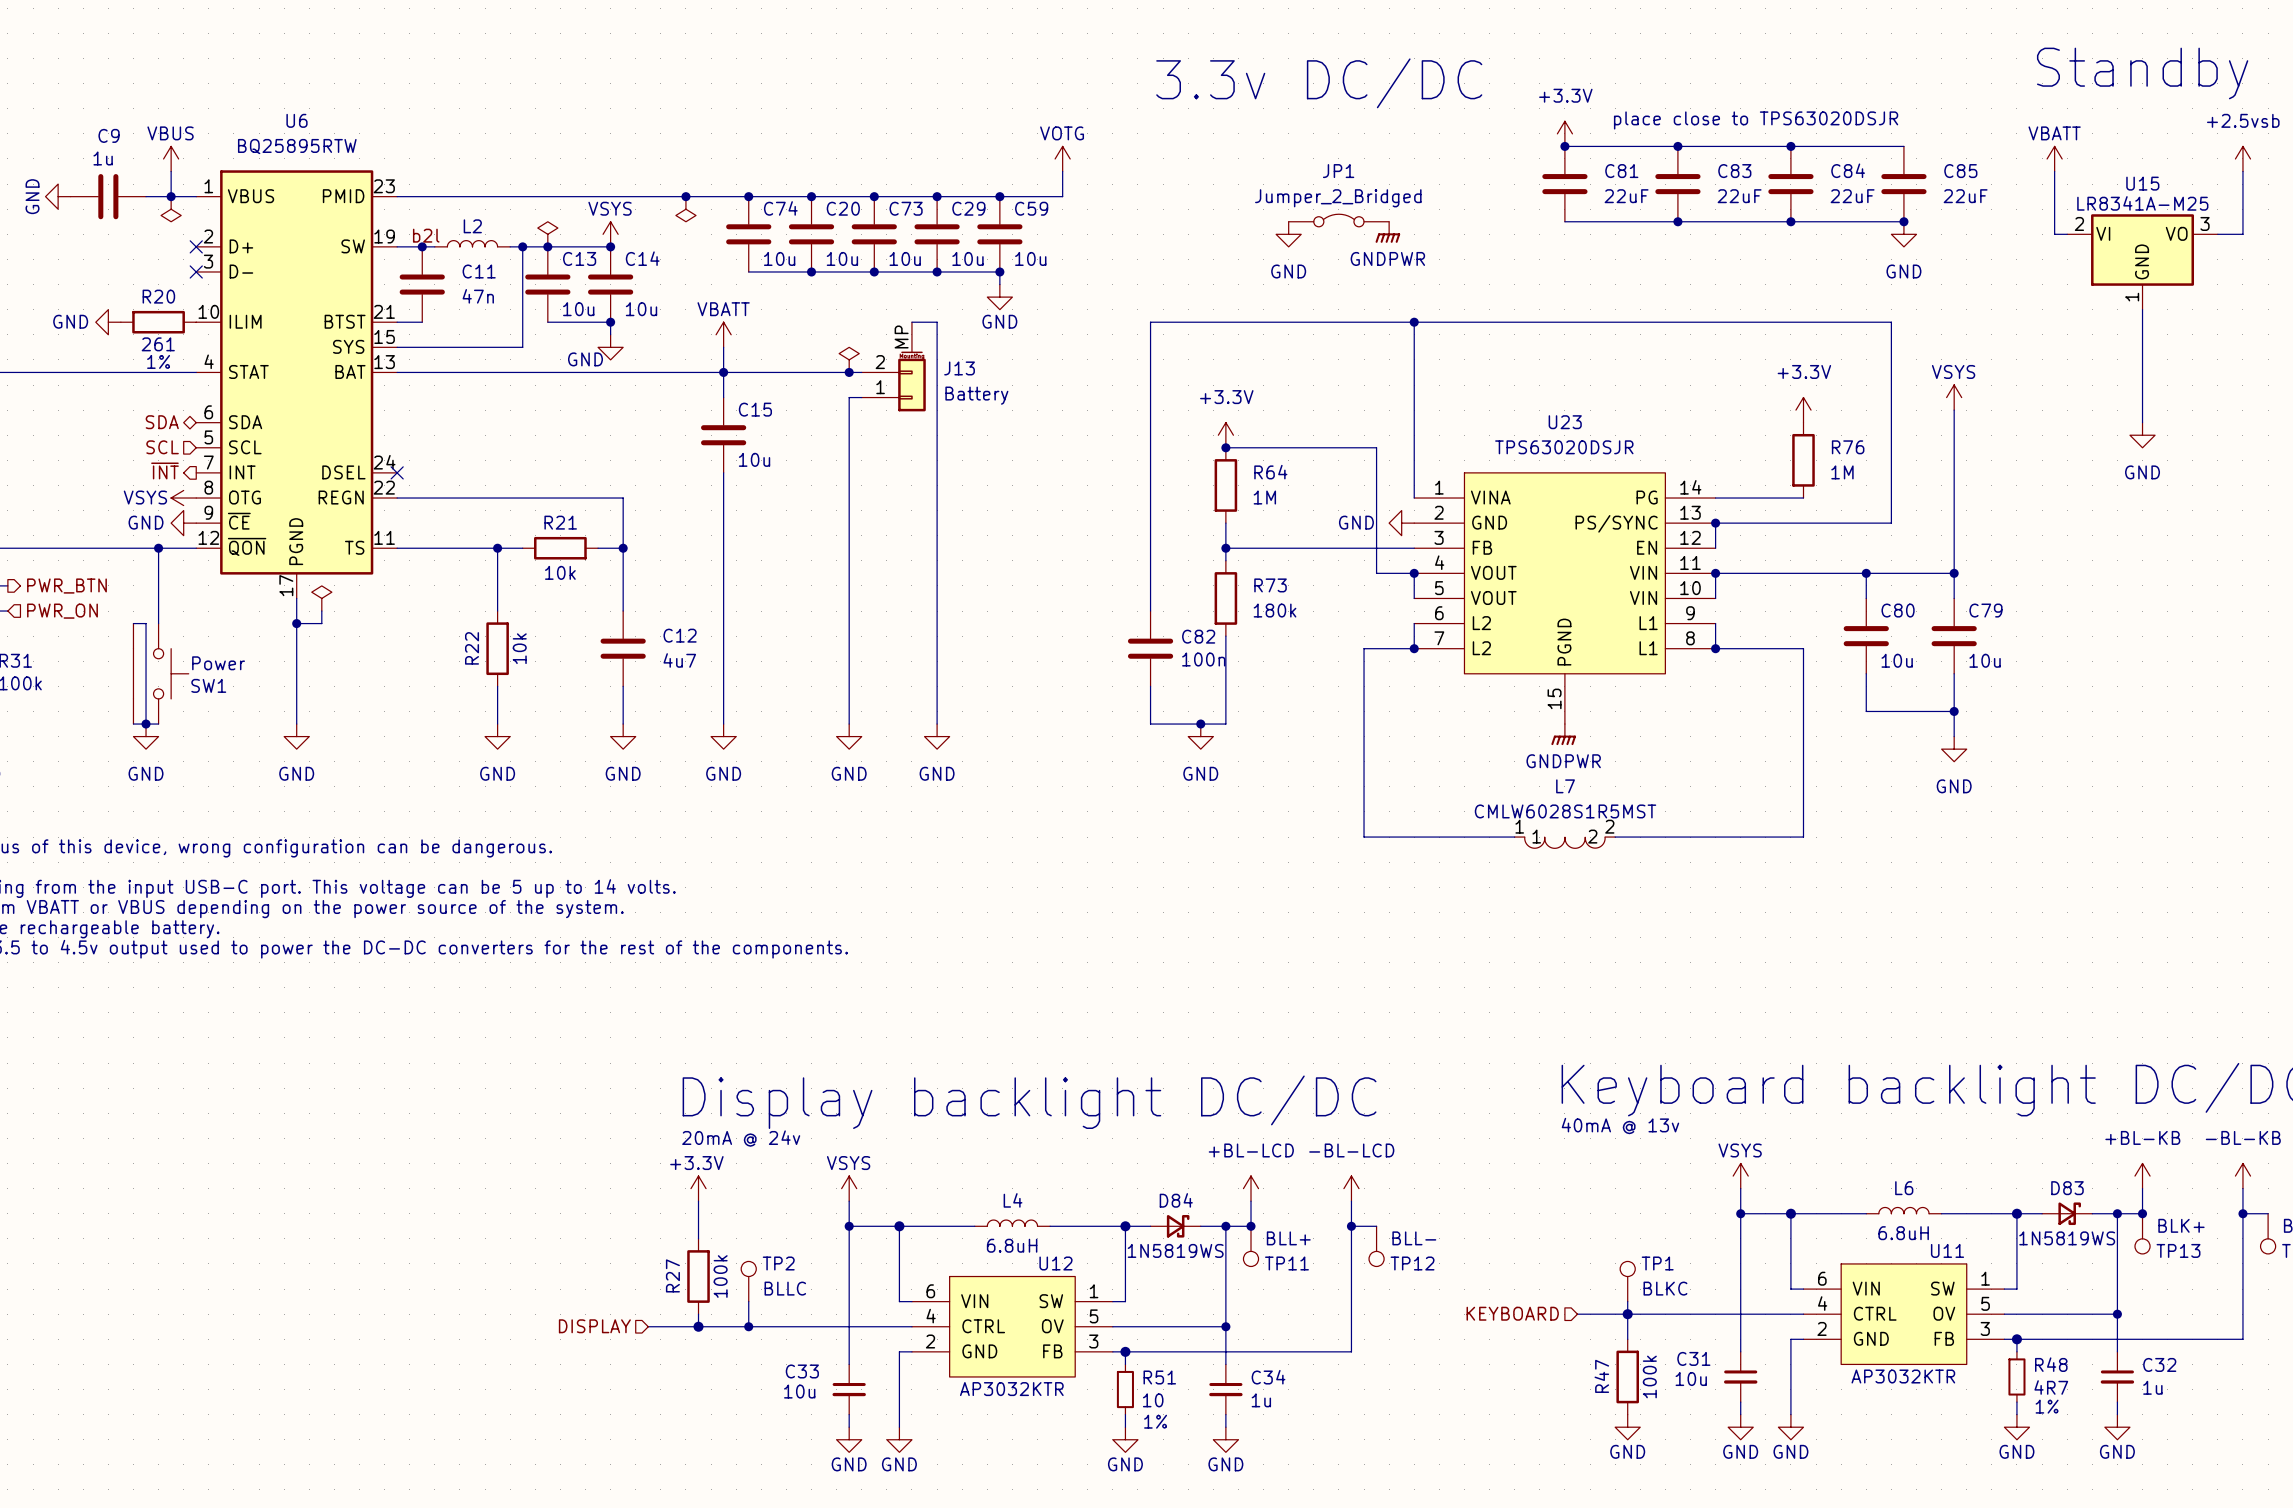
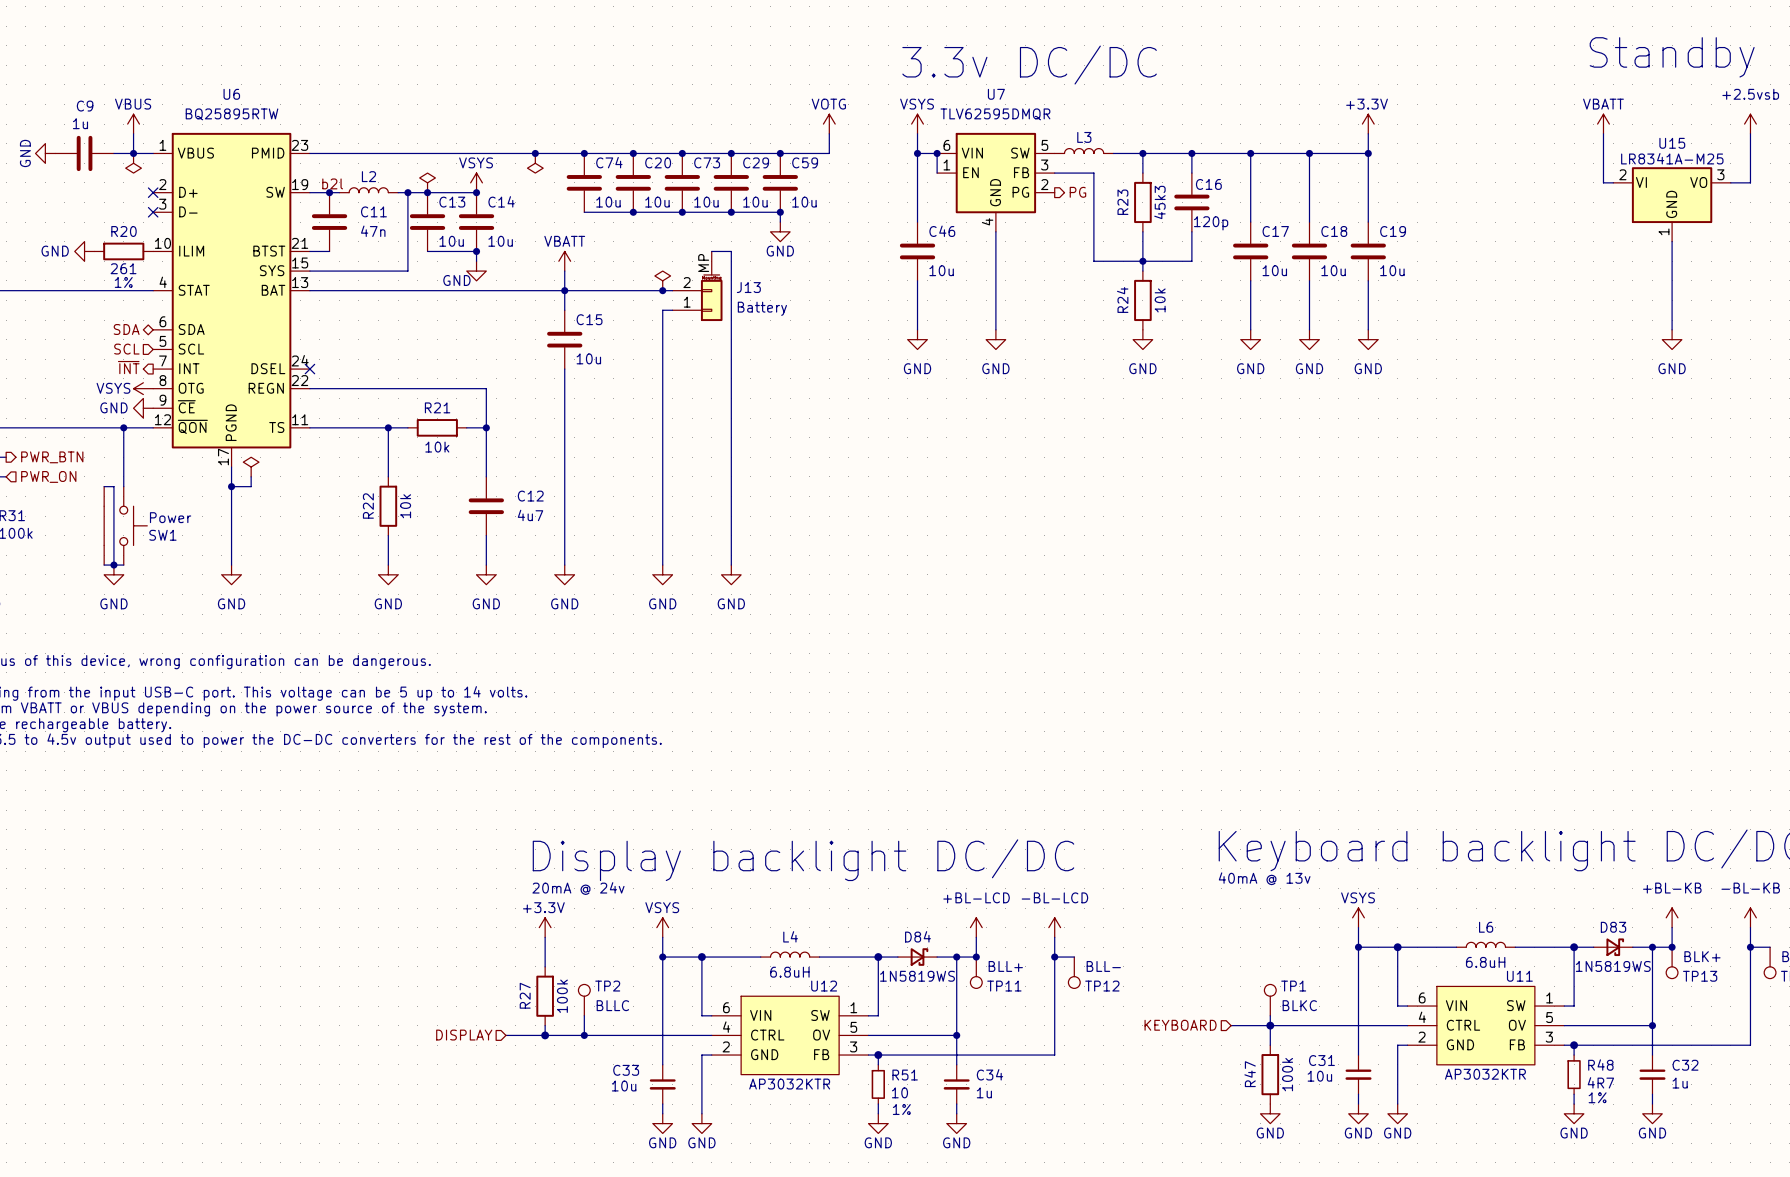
text: place close to TPS63020DSJR (1756, 120) -> none
power symbol: +3.3V (1564, 133) -> none
wire: (1564, 146) (1903, 146) -> none
junction: (1564, 146) -> none
junction: (1677, 146) -> none
junction: (1790, 146) -> none
power symbol: none -> VSYS (917, 124)
power symbol: none -> +3.3V (1368, 124)
wire: none -> (917, 133) (917, 222)
wire: none -> (1368, 133) (1368, 222)
C81: 22uF (1564, 184) -> none
C83: 22uF (1677, 184) -> none
C84: 22uF (1790, 184) -> none
C85: 22uF (1903, 184) -> none
L3: none -> (1084, 151)
wire: none -> (917, 153) (937, 153) (937, 173)
junction: none -> (917, 153)
junction: none -> (937, 153)
wire: none -> (1113, 153) (1368, 153)
wire: none -> (1142, 153) (1142, 173)
junction: none -> (1142, 153)
wire: none -> (1191, 153) (1191, 173)
junction: none -> (1191, 153)
wire: none -> (1250, 153) (1250, 222)
junction: none -> (1250, 153)
wire: none -> (1309, 153) (1309, 222)
junction: none -> (1309, 153)
junction: none -> (1368, 153)
JP1: Jumper_2_Bridged (1338, 220) -> none
wire: none -> (1054, 173) (1093, 173) (1093, 261) (1191, 261) (1191, 231)
wire: (1564, 221) (1903, 221) -> none
junction: (1677, 221) -> none
junction: (1790, 221) -> none
junction: (1903, 221) -> none
power symbol: GNDPWR (1387, 232) -> none
U7: none -> TLV62595DMQR (995, 182)
power symbol: GND (1288, 234) -> none
power symbol: GND (1903, 234) -> none
hierarchical label: none -> PG (1077, 192)
R23: none -> 45k3 (1142, 202)
C16: none -> 120p (1191, 202)
wire: none -> (995, 231) (995, 329)
wire: none -> (1142, 231) (1142, 271)
C46: none -> 10u (917, 251)
wire: (1414, 322) (1414, 498) -> none
junction position: (1414, 322) -> (1142, 261)
C17: none -> 10u (1250, 251)
C18: none -> 10u (1309, 251)
C19: none -> 10u (1368, 251)
wire: none -> (917, 280) (917, 329)
wire: none -> (1250, 280) (1250, 329)
wire: none -> (1309, 280) (1309, 329)
wire: none -> (1368, 280) (1368, 329)
R24: none -> 10k (1142, 300)
power symbol: VSYS (1954, 397) -> none
power symbol: +3.3V (1803, 410) -> none
wire: (1954, 410) (1954, 598) -> none
power symbol: none -> GND (917, 339)
power symbol: +3.3V (1225, 435) -> none
power symbol: none -> GND (995, 339)
power symbol: none -> GND (1142, 339)
power symbol: none -> GND (1250, 339)
power symbol: none -> GND (1309, 339)
power symbol: none -> GND (1368, 339)
wire: (1225, 447) (1376, 447) (1376, 573) (1414, 573) (1414, 598) -> none
junction: (1225, 447) -> none
R76: 1M (1803, 460) -> none
R64: 1M (1225, 485) -> none
wire: (1715, 498) (1803, 498) -> none
wire: (1225, 523) (1225, 560) -> none
power symbol: GND (1401, 523) -> none
junction: (1715, 523) -> none
wire: (1225, 548) (1414, 548) -> none
junction: (1225, 548) -> none
wire: (1715, 548) (1715, 523) (1891, 523) (1891, 322) (1150, 322) (1150, 611) -> none
junction: (1414, 573) -> none
junction: (1715, 573) -> none
wire: (1866, 573) (1866, 598) -> none
junction: (1866, 573) -> none
wire: (1954, 573) (1715, 573) (1715, 598) -> none
junction: (1954, 573) -> none
R73: 180k (1225, 598) -> none
U23: TPS63020DSJR (1564, 598) -> none
wire: (1414, 623) (1414, 648) (1364, 648) (1364, 837) (1514, 837) -> none
wire: (1715, 623) (1715, 648) (1803, 648) (1803, 837) (1615, 837) -> none
wire: (1225, 636) (1225, 724) (1150, 724) (1150, 686) -> none
C80: 10u (1866, 636) -> none
C79: 10u (1954, 636) -> none
C82: 100n (1150, 648) -> none
junction: (1414, 648) -> none
junction: (1715, 648) -> none
wire: (1866, 673) (1866, 711) (1954, 711) -> none
wire: (1954, 673) (1954, 736) -> none
junction: (1954, 711) -> none
junction: (1200, 724) -> none
power symbol: GNDPWR (1563, 734) -> none
power symbol: GND (1200, 736) -> none
power symbol: GND (1954, 749) -> none
L7: CMLW6028S1R5MST (1564, 842) -> none

